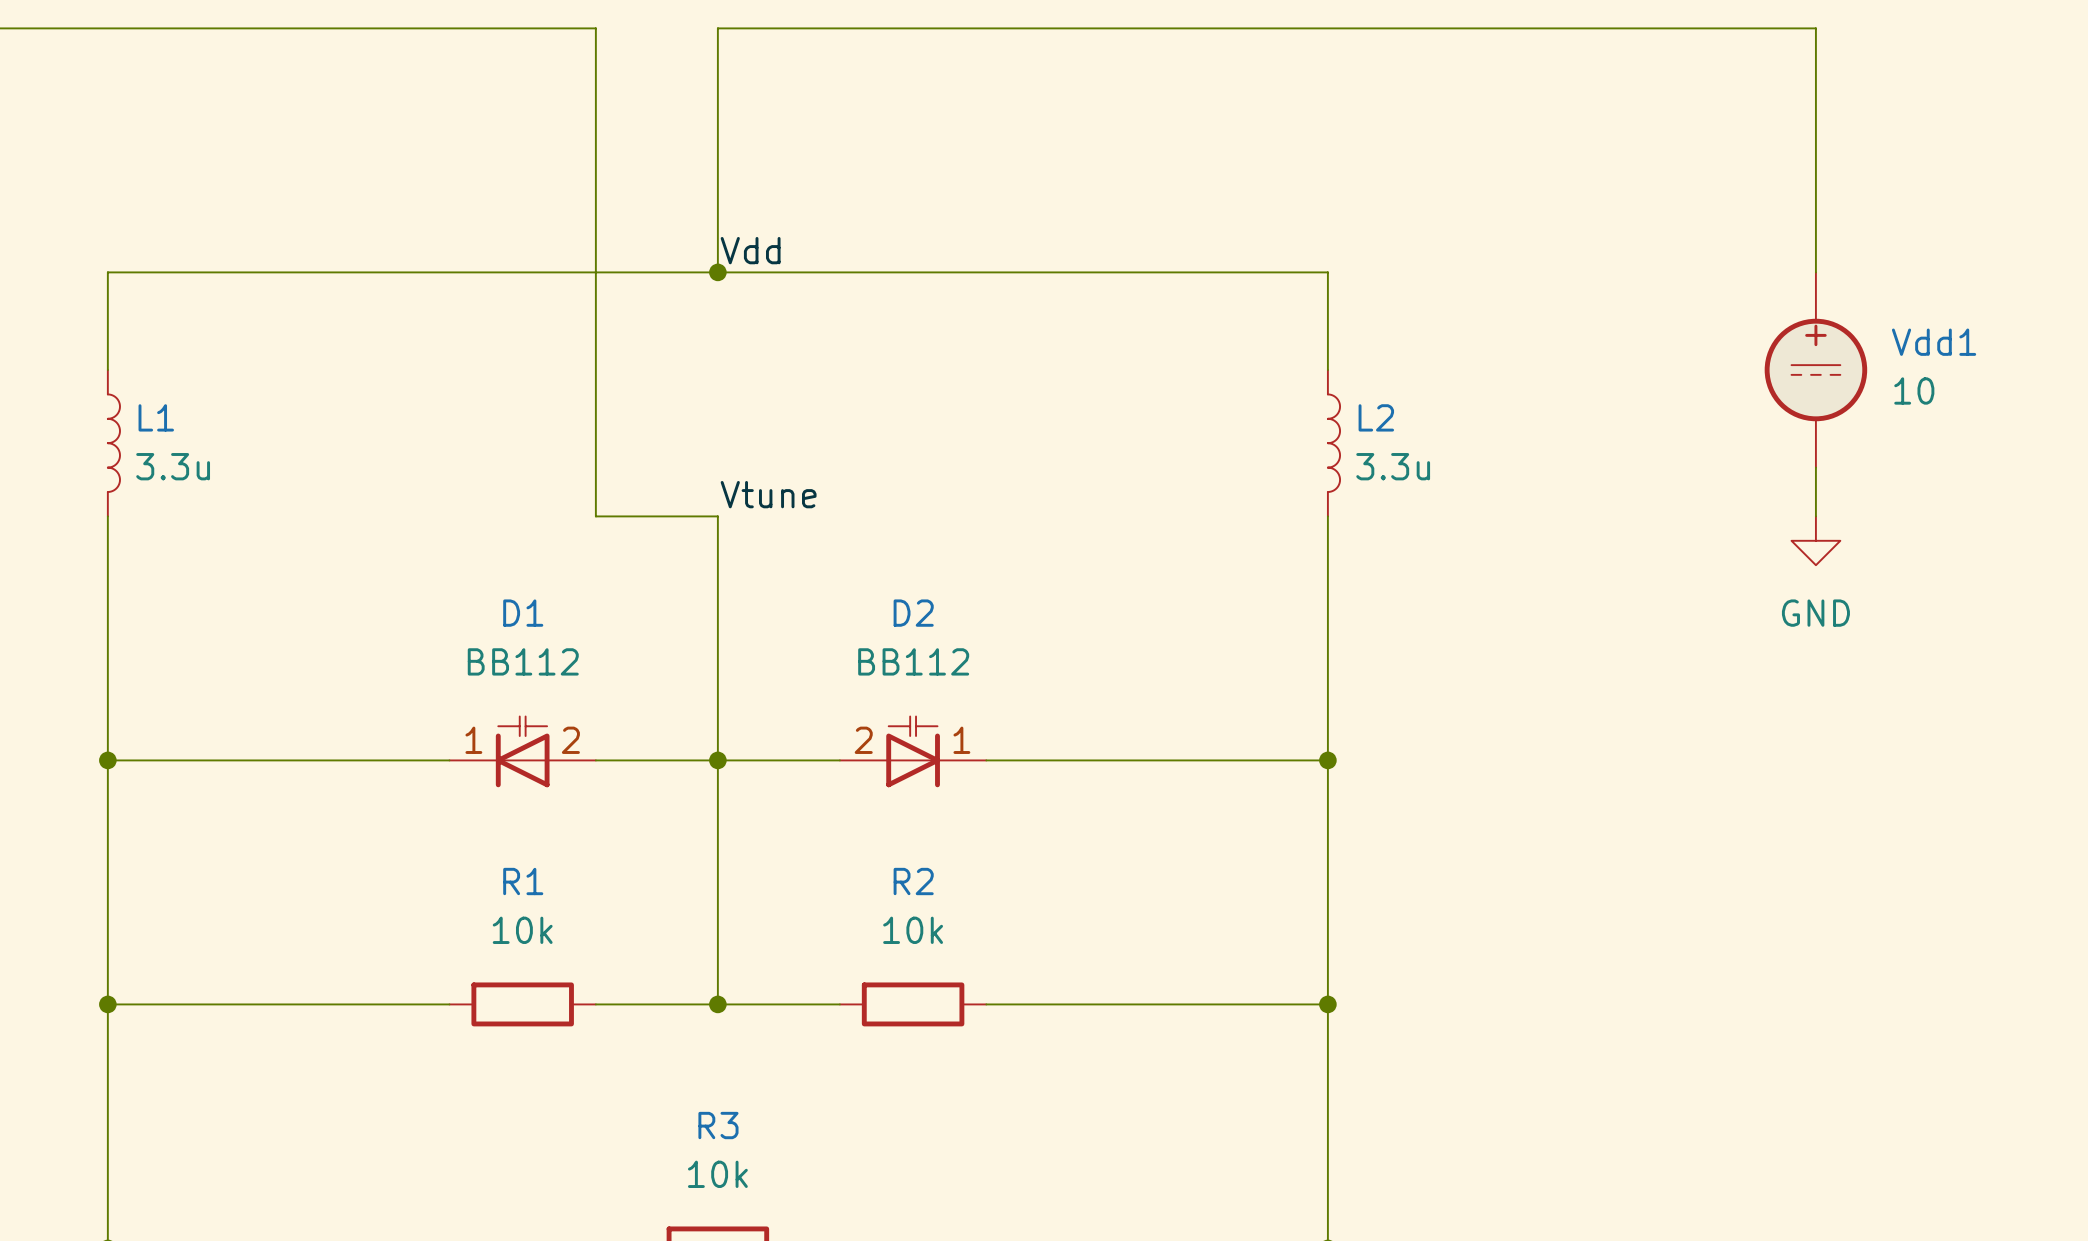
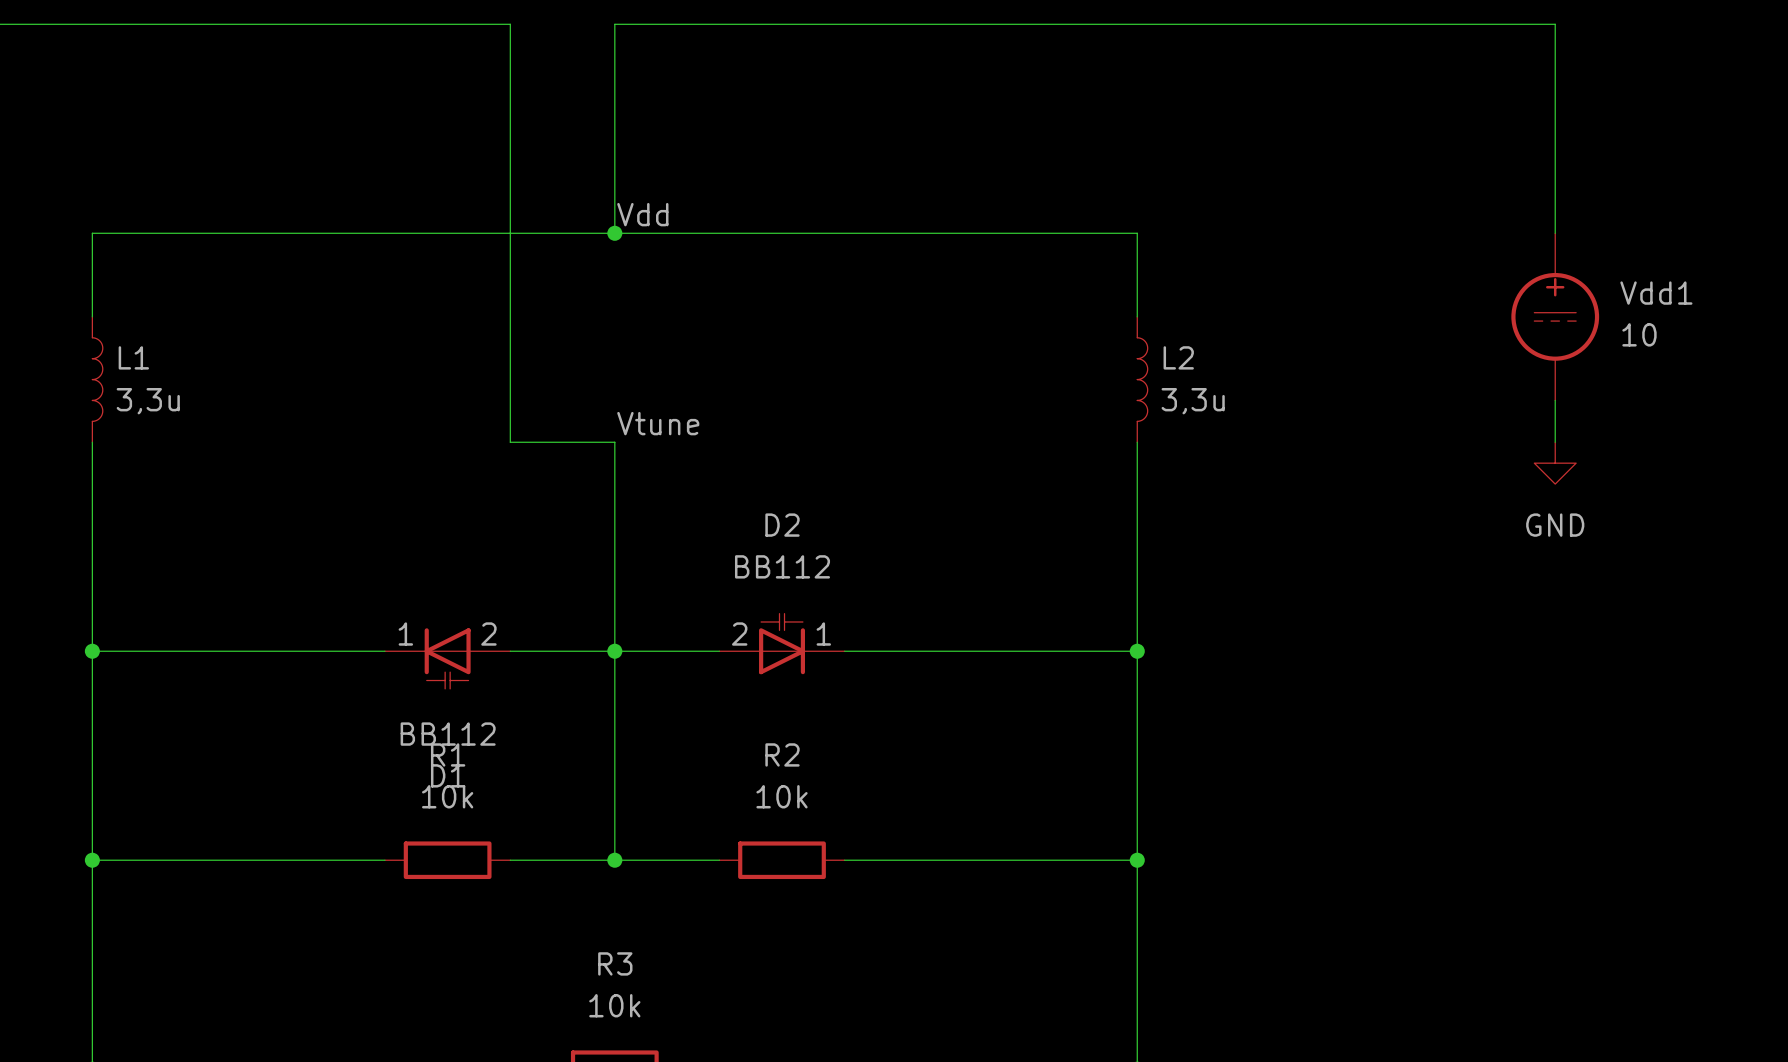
L1 value: 3.3u (173, 466) -> 3,3u (148, 401)
L2 value: 3.3u (1393, 466) -> 3,3u (1193, 401)
D1 flip: as is (522, 751) -> up-down (447, 658)

